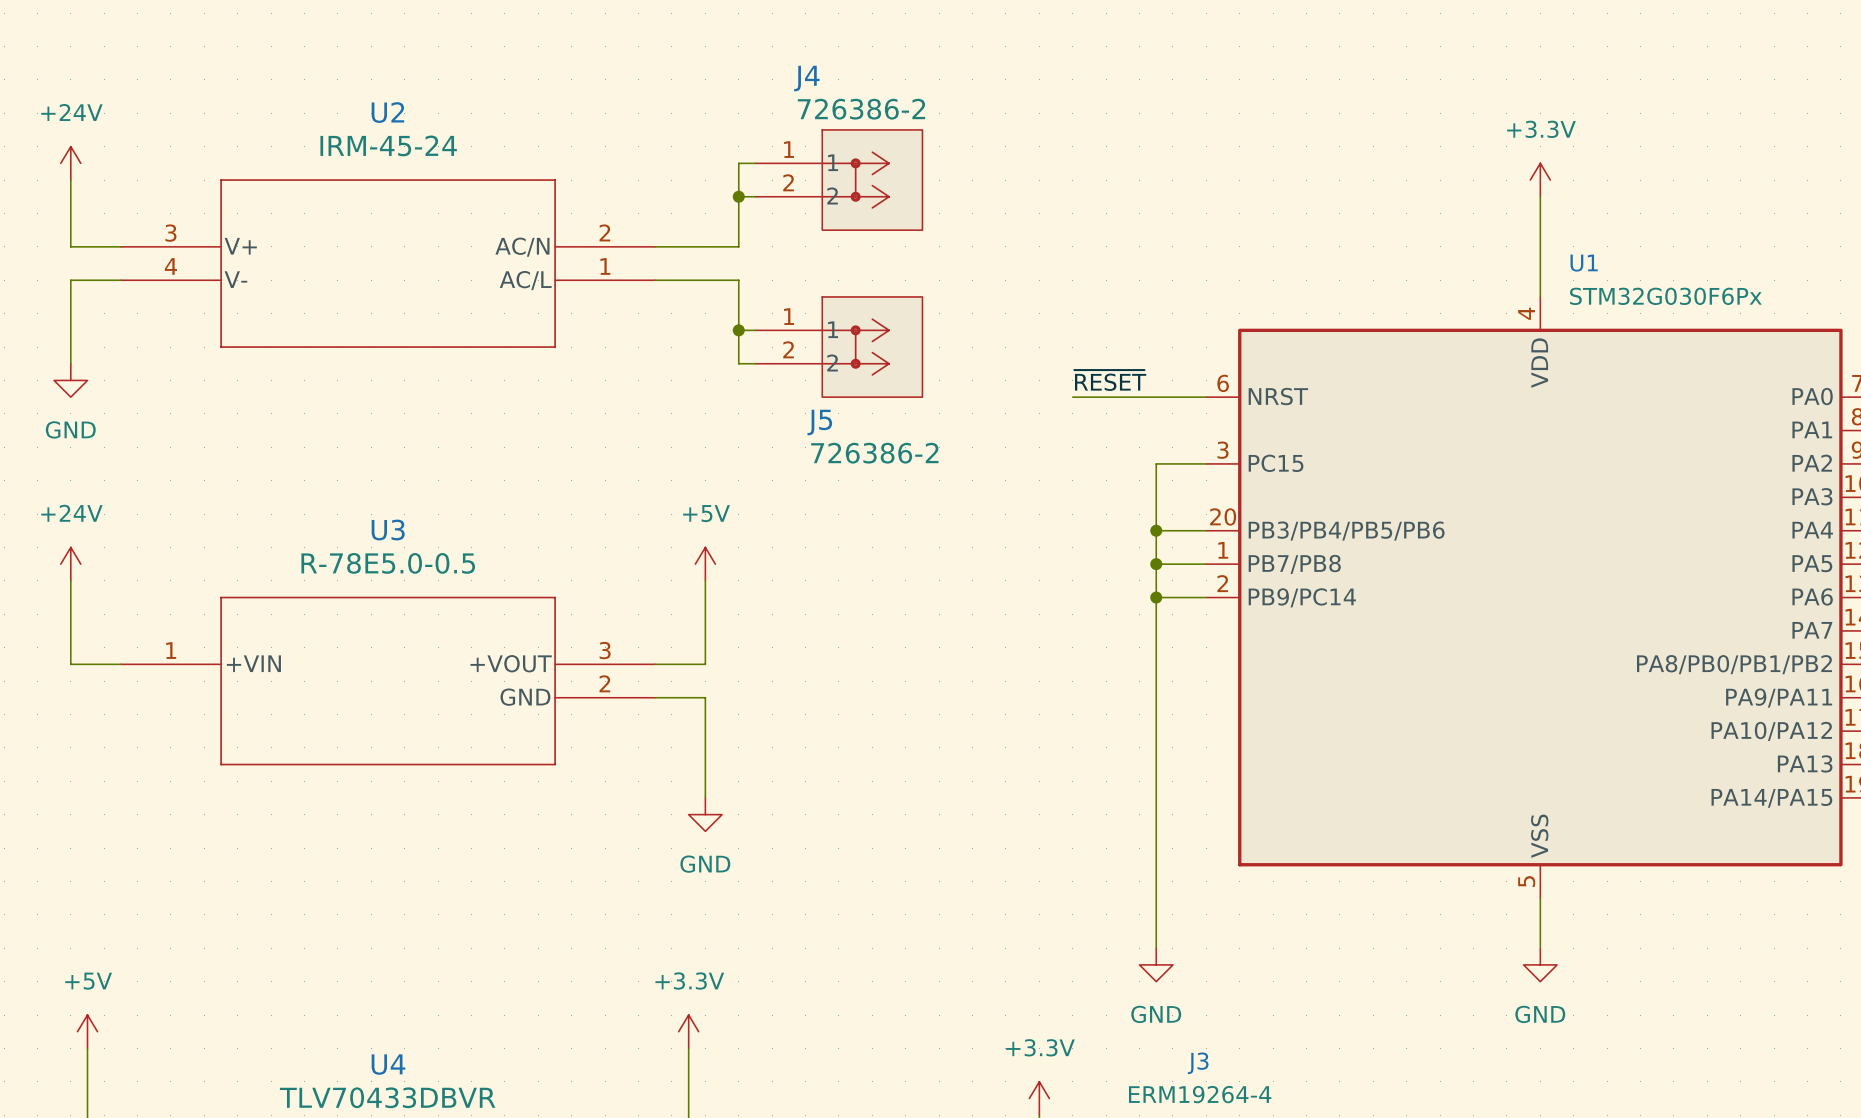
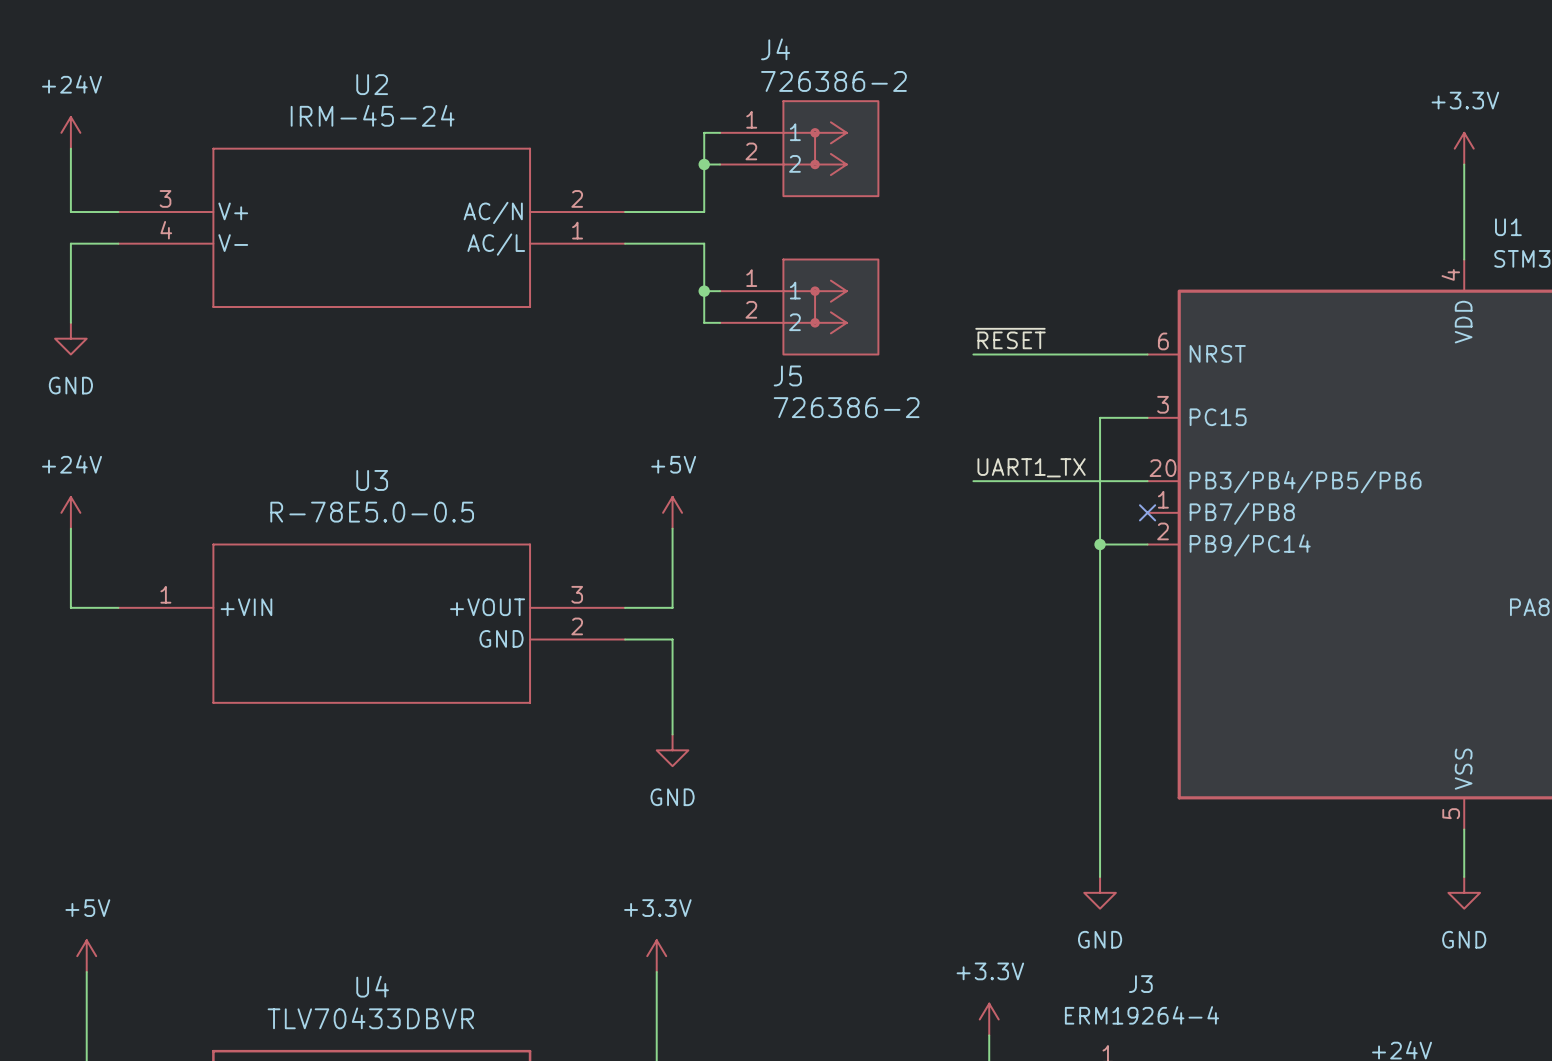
label position: ~{RESET} (1110, 380) -> ~{RESET} (1010, 338)
label: none -> UART1_TX (1031, 467)
wire: none -> (973, 481) (1100, 481)
junction: (1156, 530) -> none
wire: (1156, 564) (1206, 564) -> (973, 354) (1020, 354)
junction: (1156, 564) -> none
no-connect mark: none -> (1147, 512)

